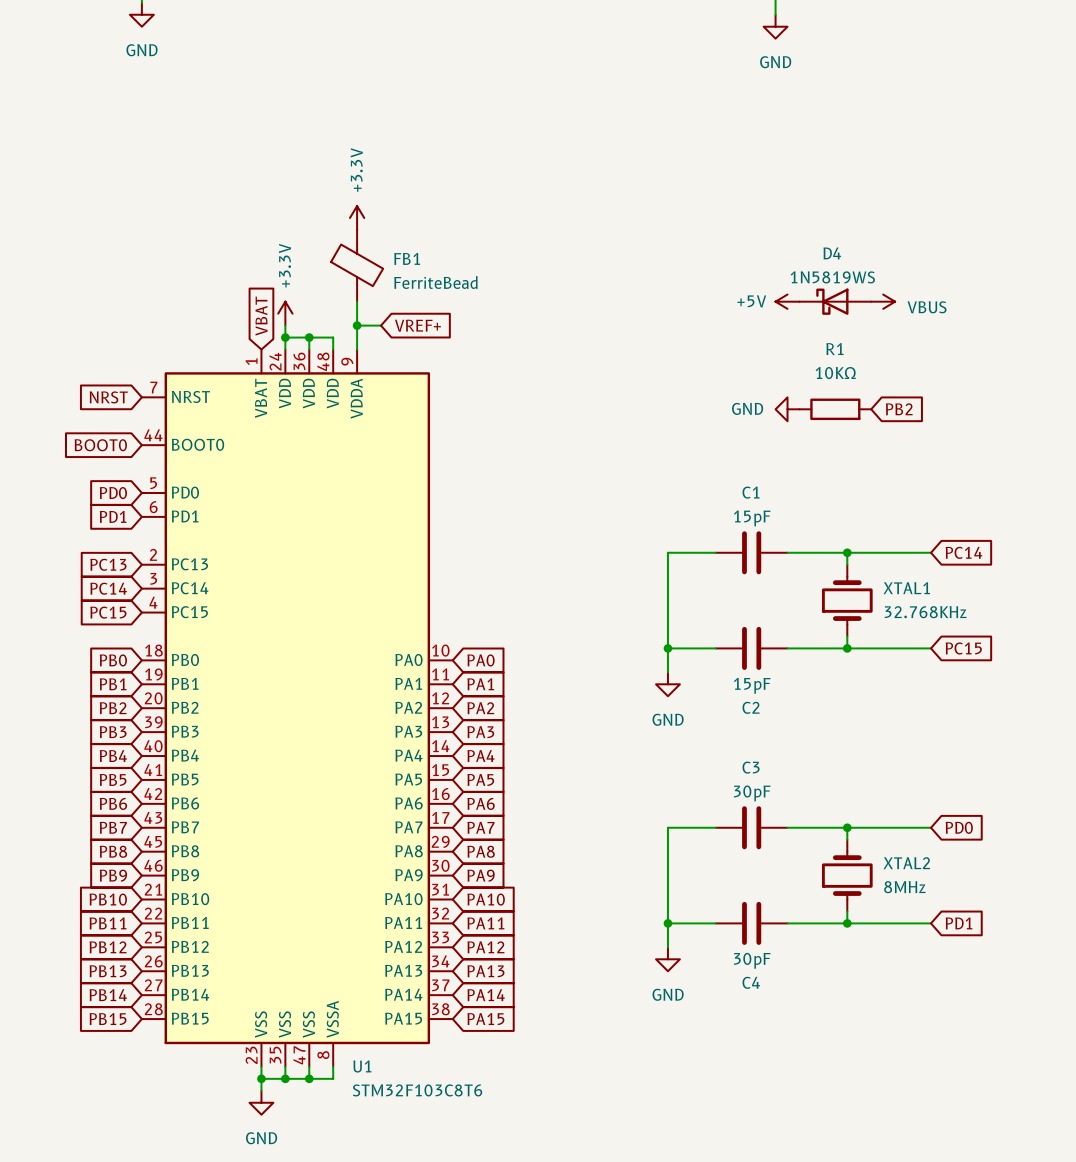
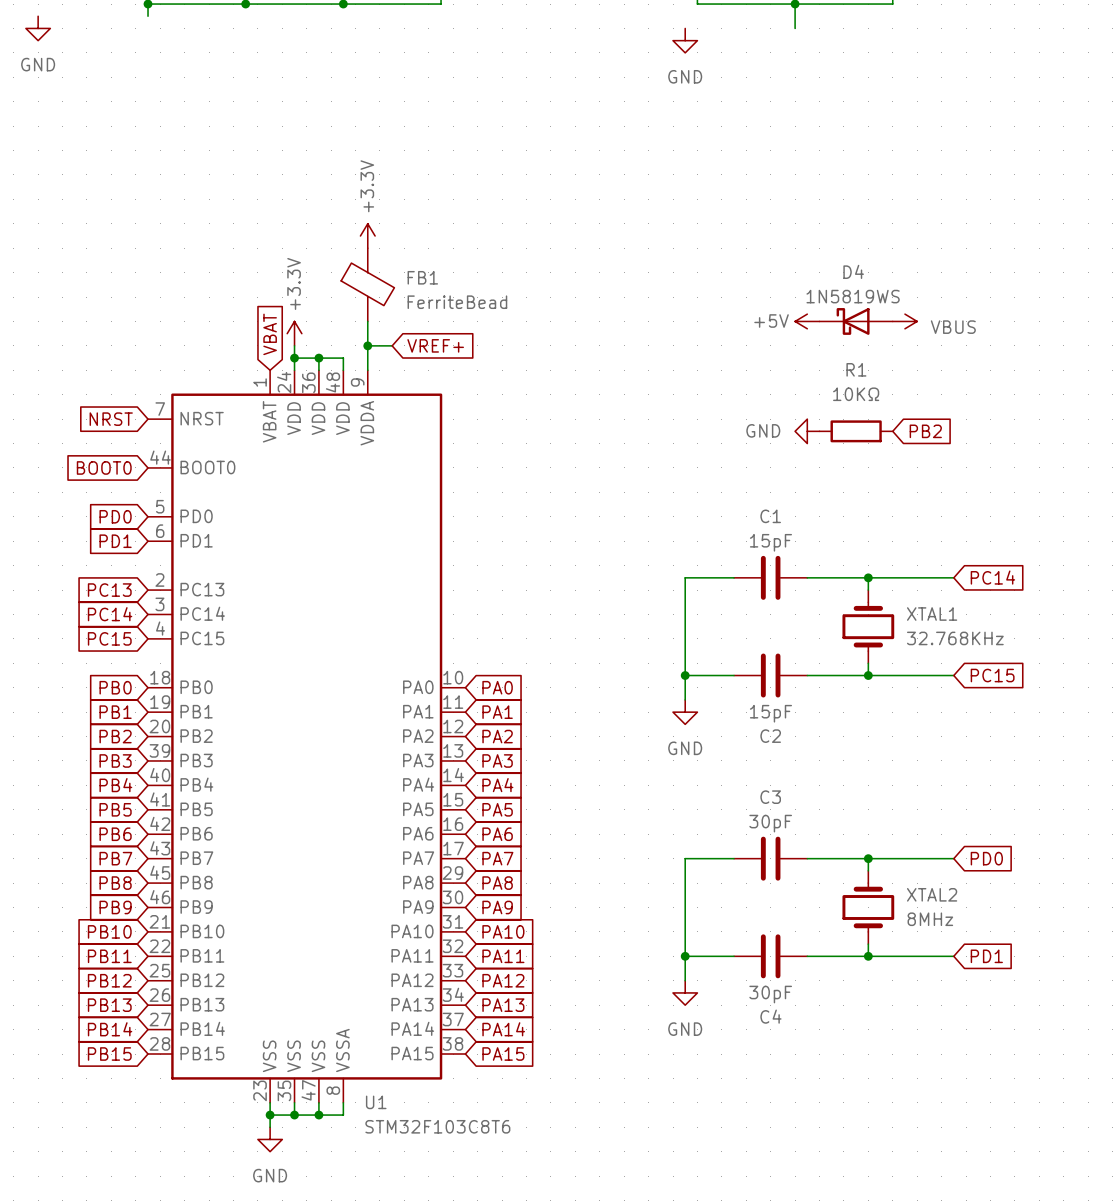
power symbol position: GND (141, 14) -> GND (38, 28)
power symbol position: GND (775, 26) -> GND (685, 40)

